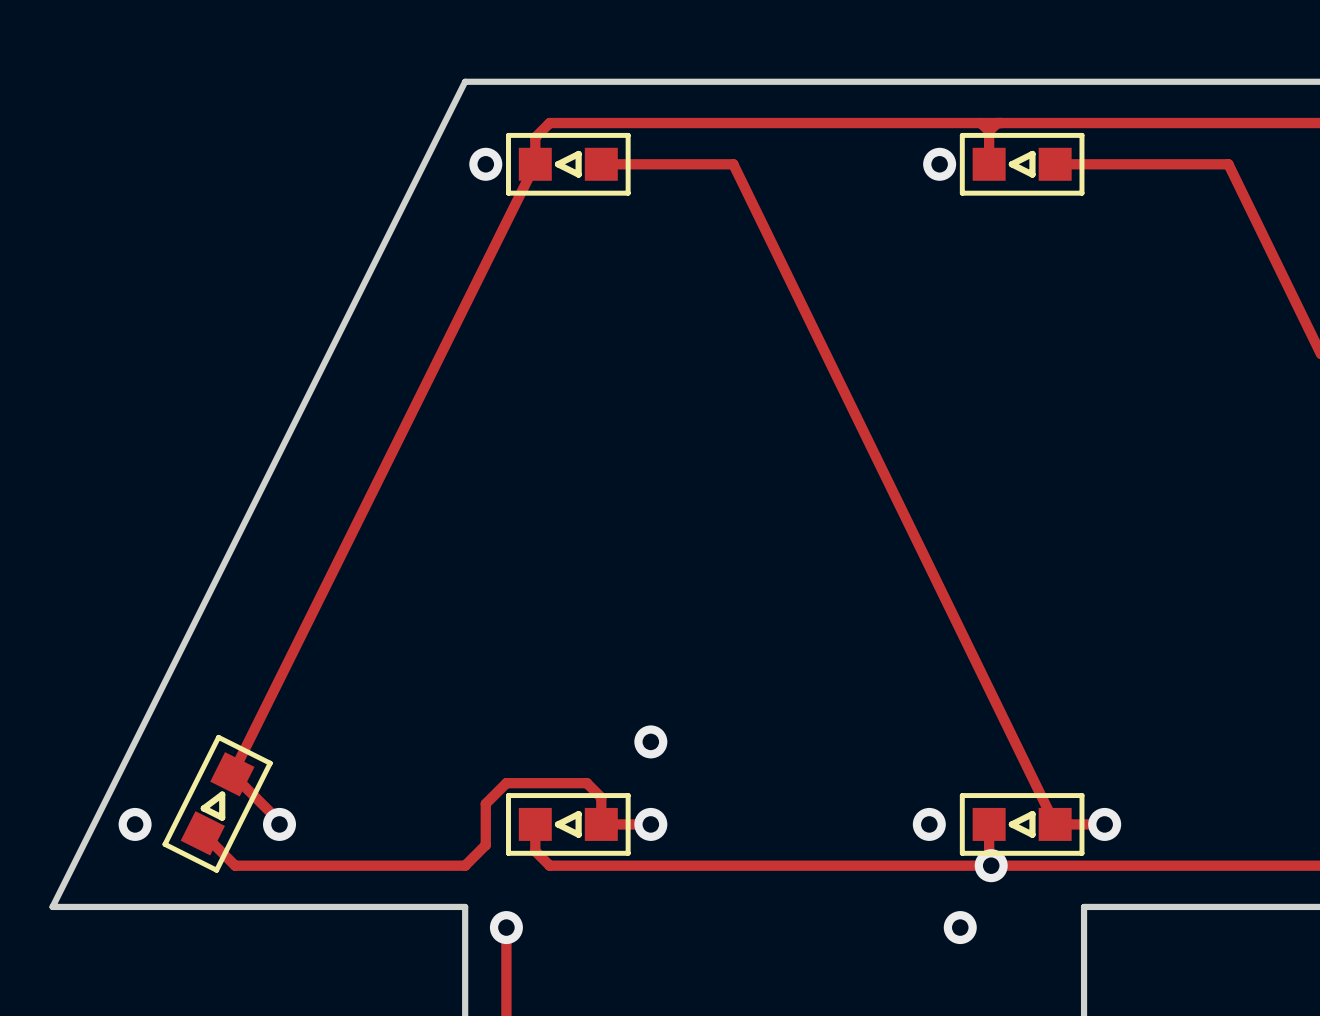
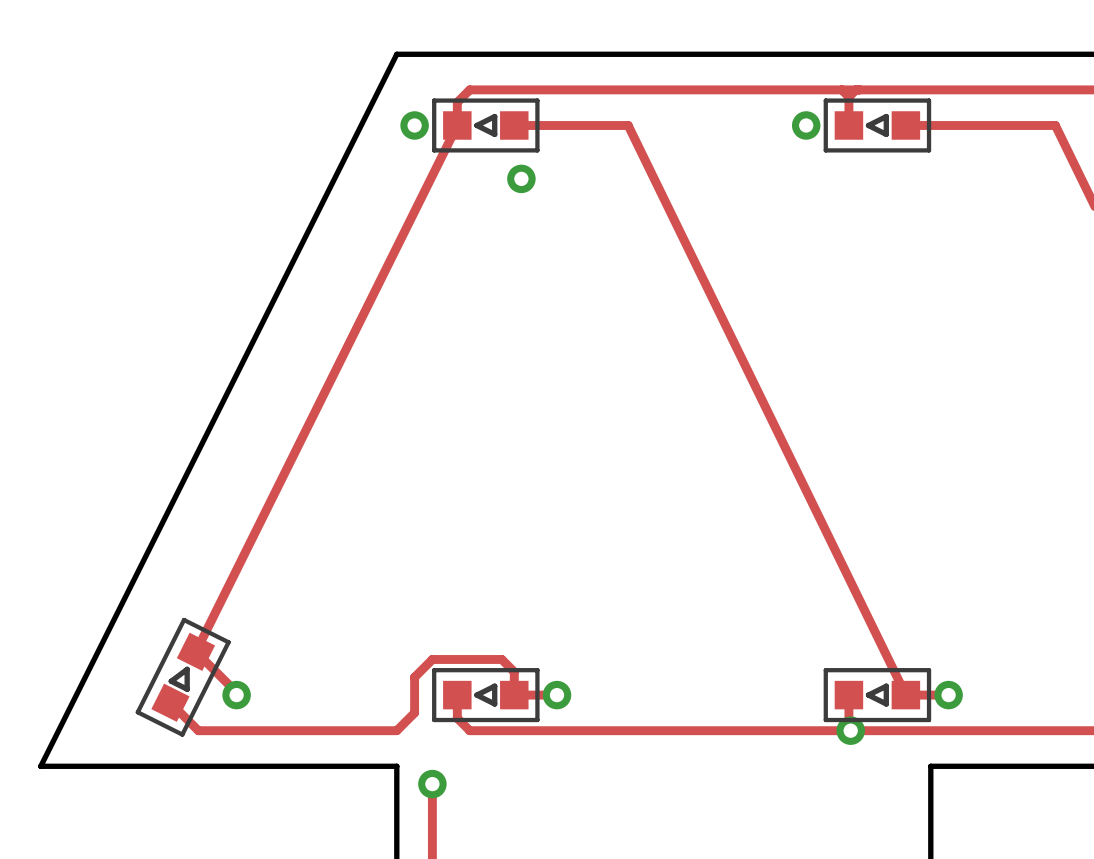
via: none -> (521, 178)
via: (650, 741) -> none
via: (135, 824) -> none
via: (929, 824) -> none
via: (960, 927) -> none

